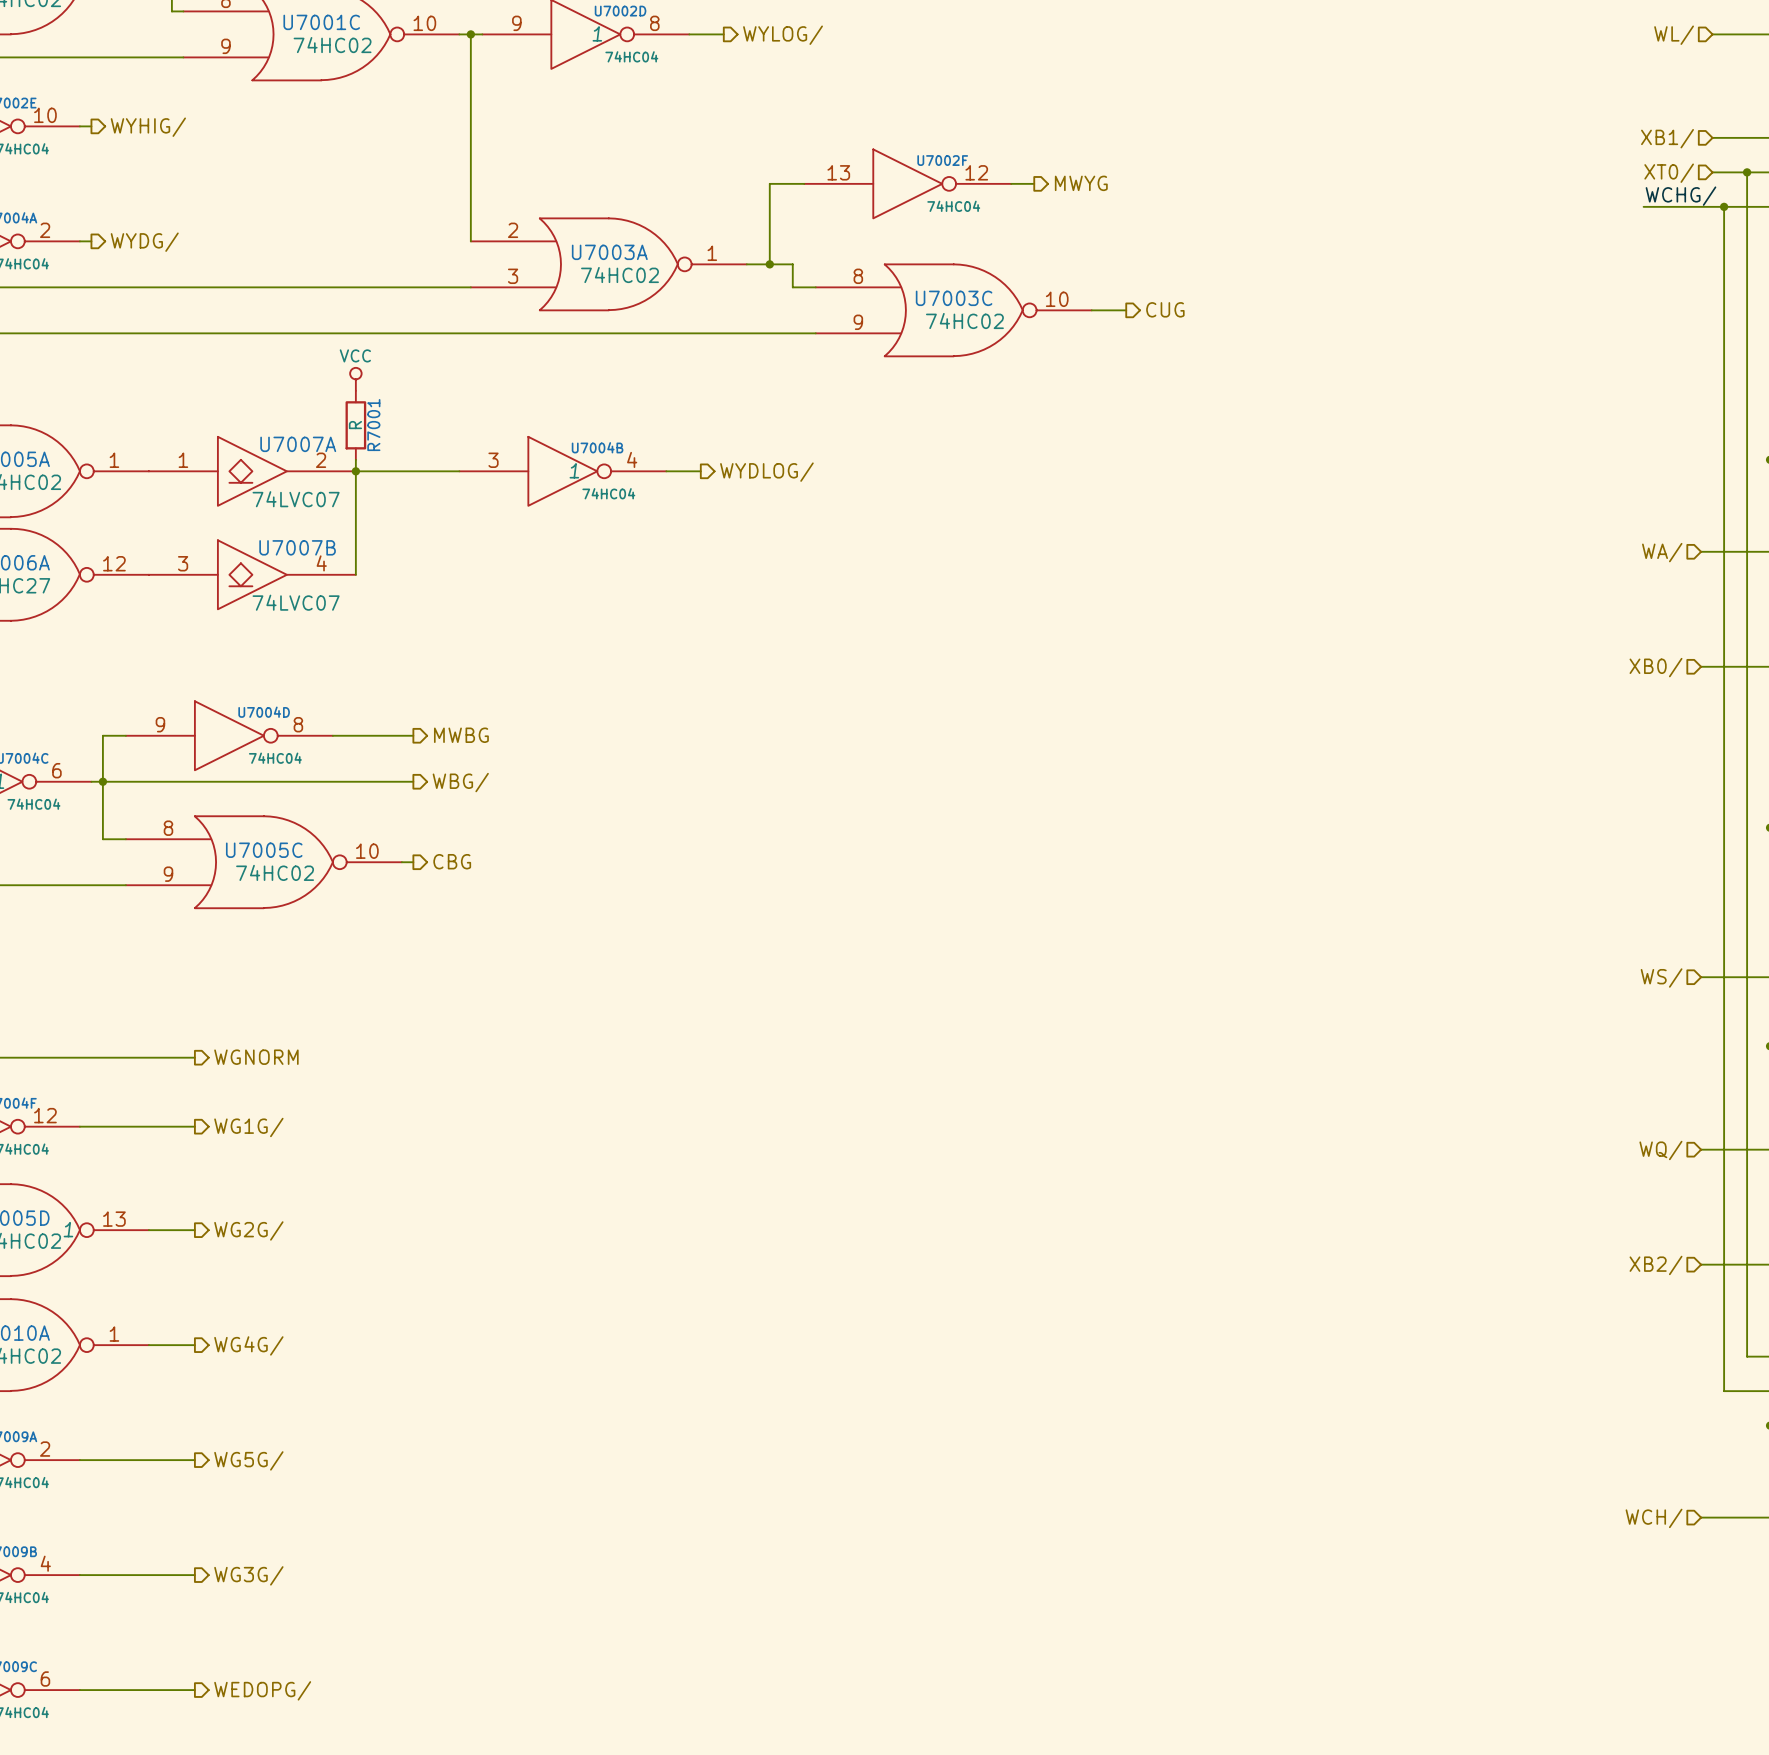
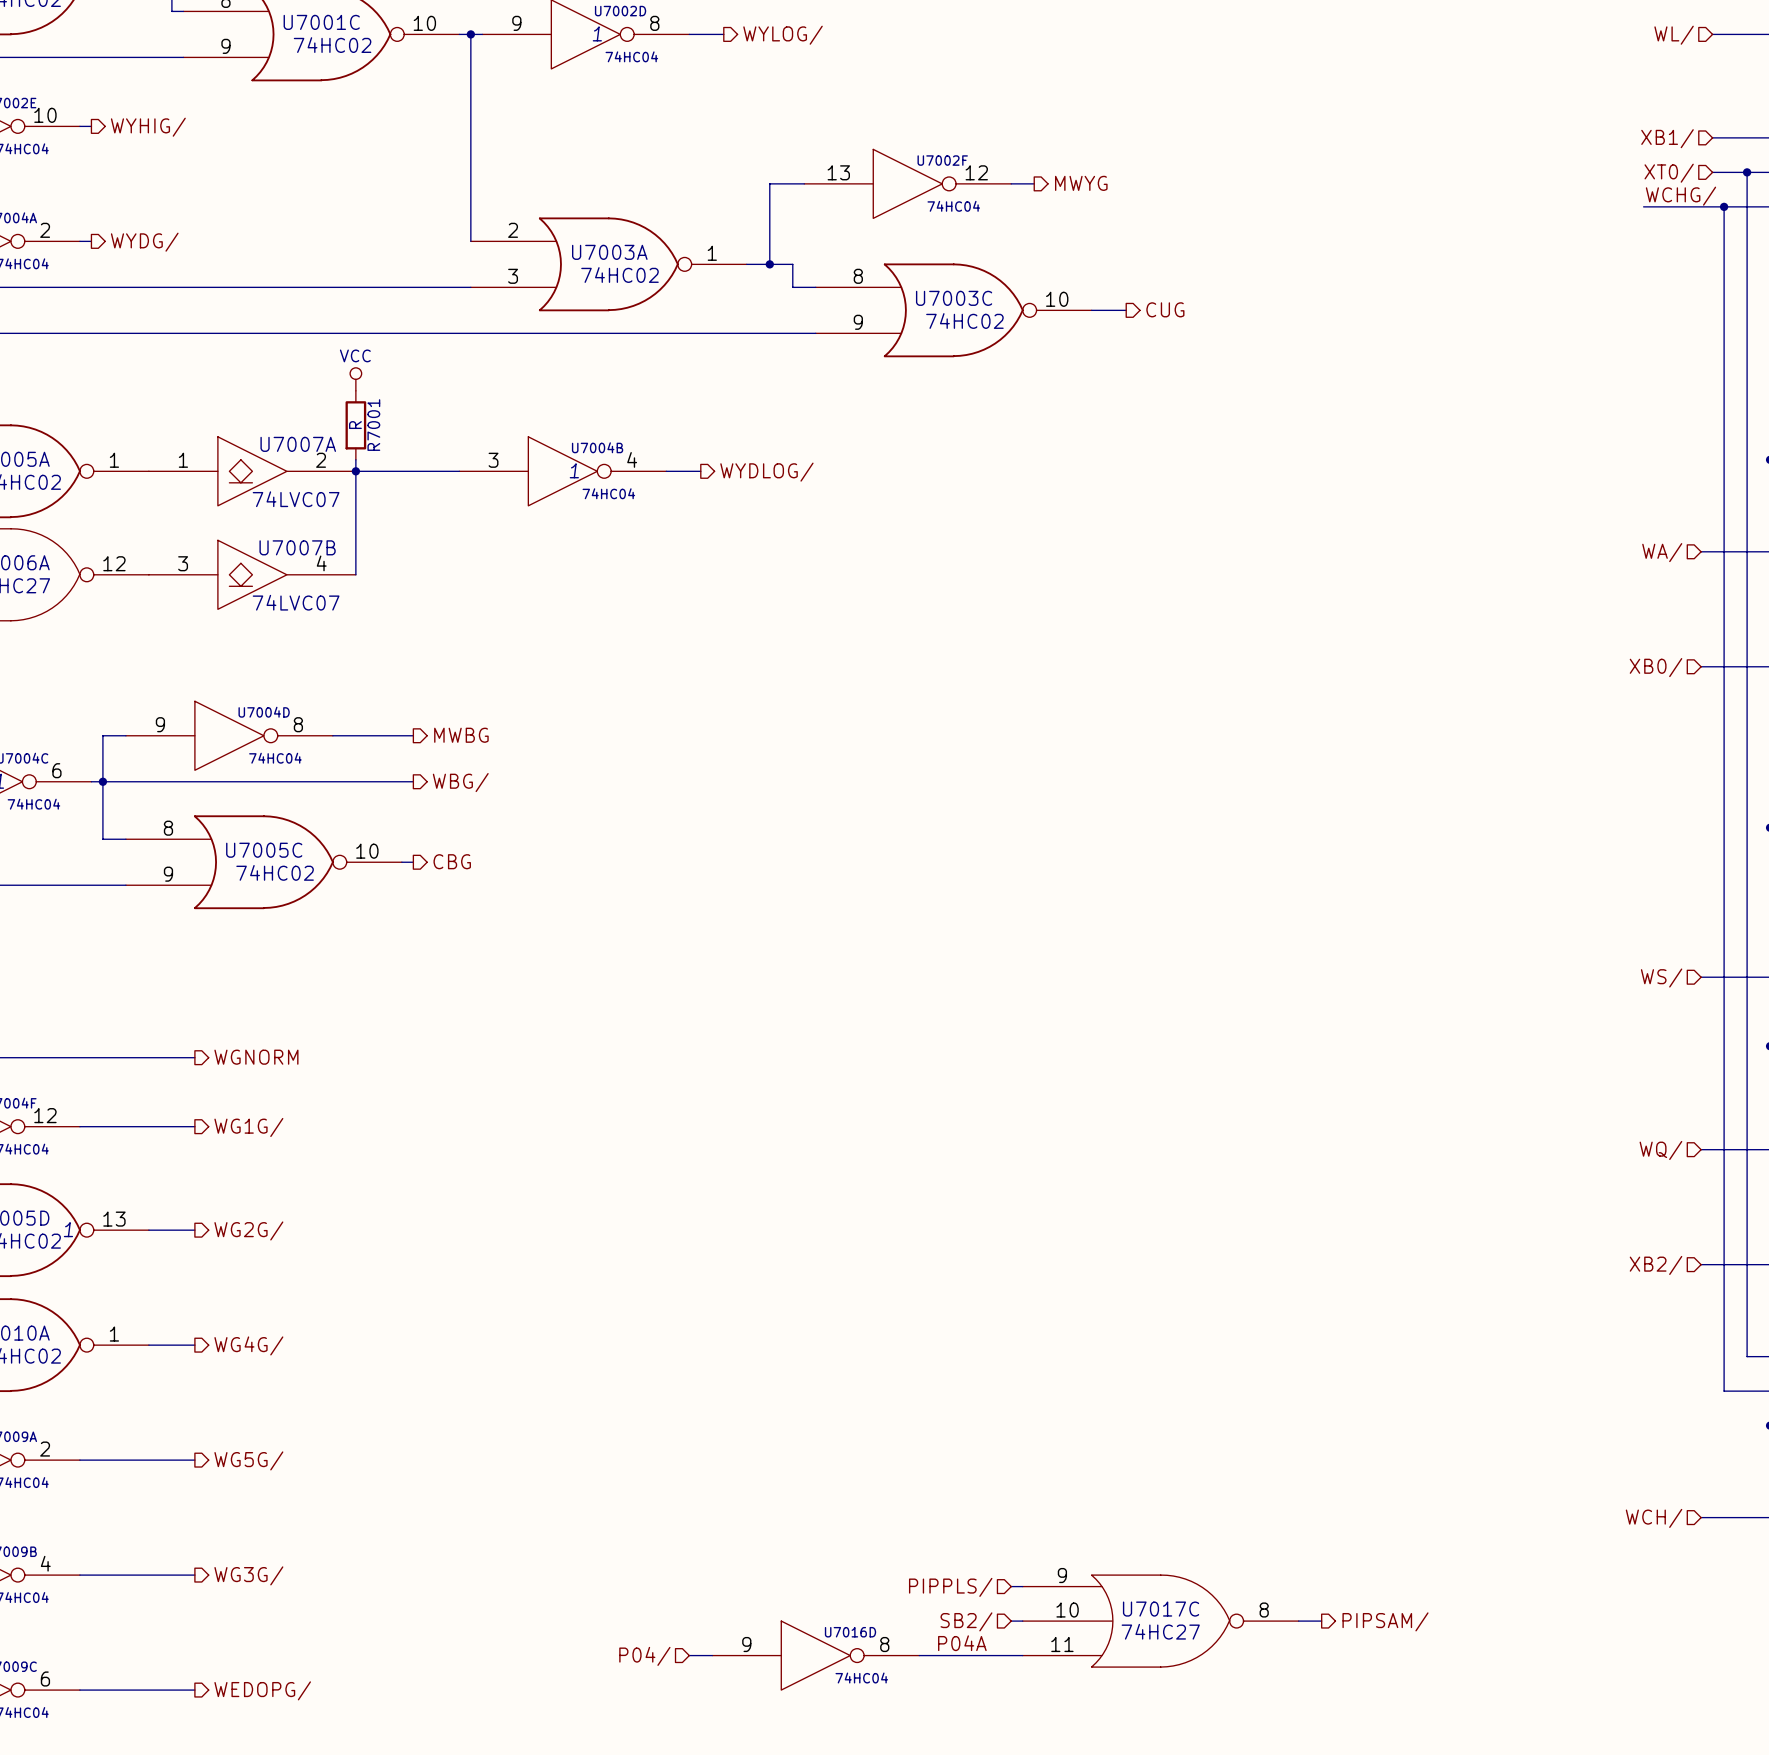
wire: none -> (1011, 1586) (1022, 1586)
hierarchical label: none -> PIPPLS/ (950, 1587)
hierarchical label: none -> SB2/ (966, 1621)
wire: none -> (1011, 1621) (1022, 1621)
U7017C: none -> 74HC27 (1160, 1621)
wire: none -> (1298, 1621) (1321, 1621)
hierarchical label: none -> PIPSAM/ (1385, 1621)
label: none -> P04A (962, 1643)
wire: none -> (689, 1655) (712, 1655)
U7016D: none -> 74HC04 (815, 1655)
wire: none -> (919, 1655) (1022, 1655)
hierarchical label: none -> P04/ (644, 1656)

